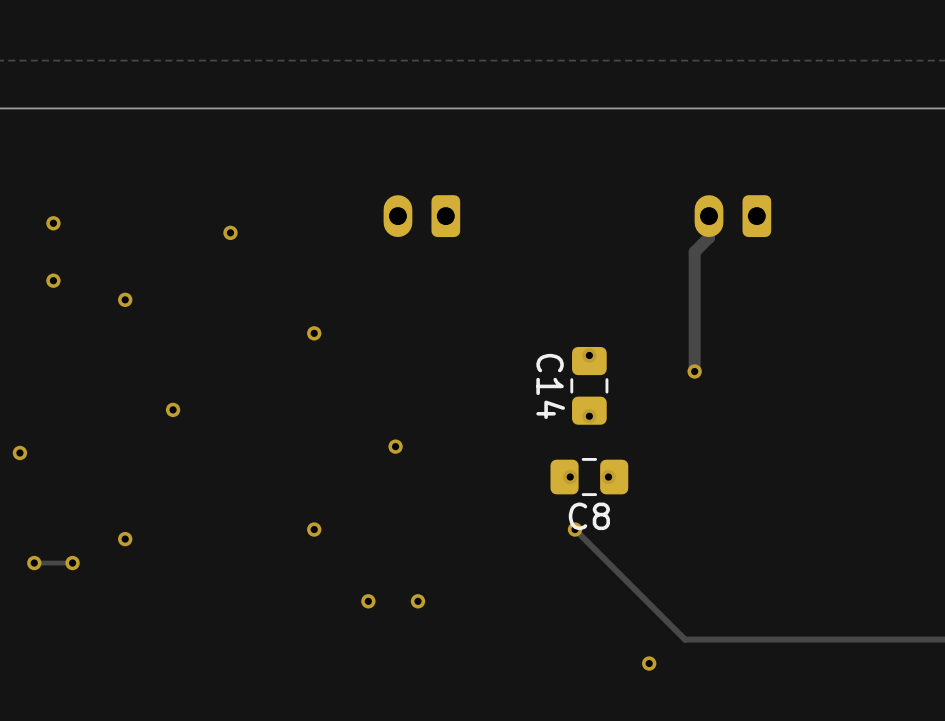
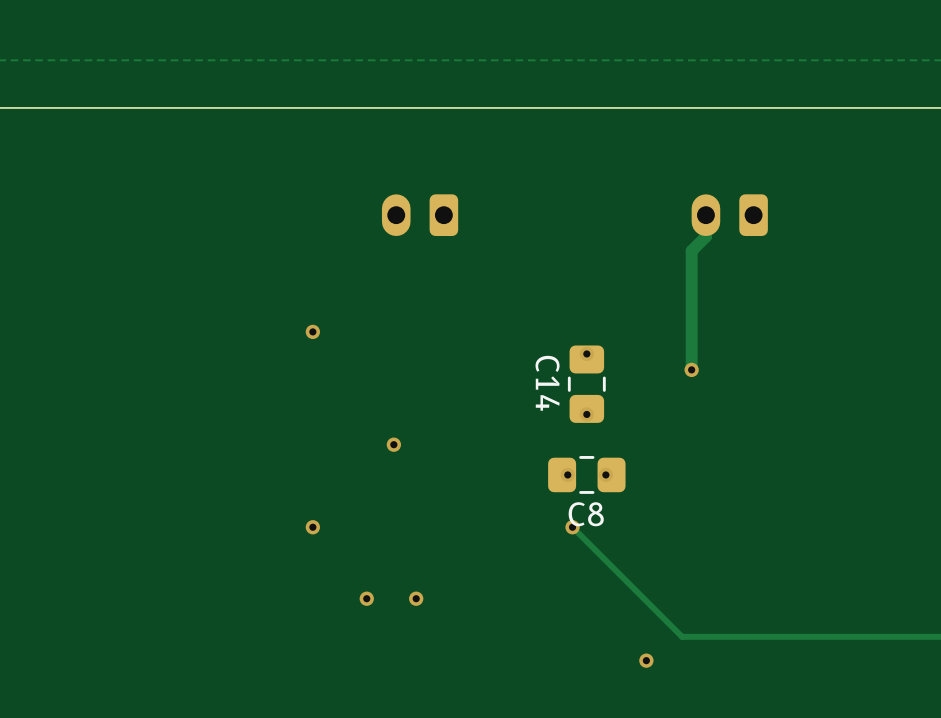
via: (53, 223) -> none
via: (230, 232) -> none
via: (53, 280) -> none
via: (125, 299) -> none
via: (173, 409) -> none
via: (19, 452) -> none
via: (125, 539) -> none
via: (34, 563) -> none
track: (72, 563) (34, 563) -> none
via: (72, 563) -> none

